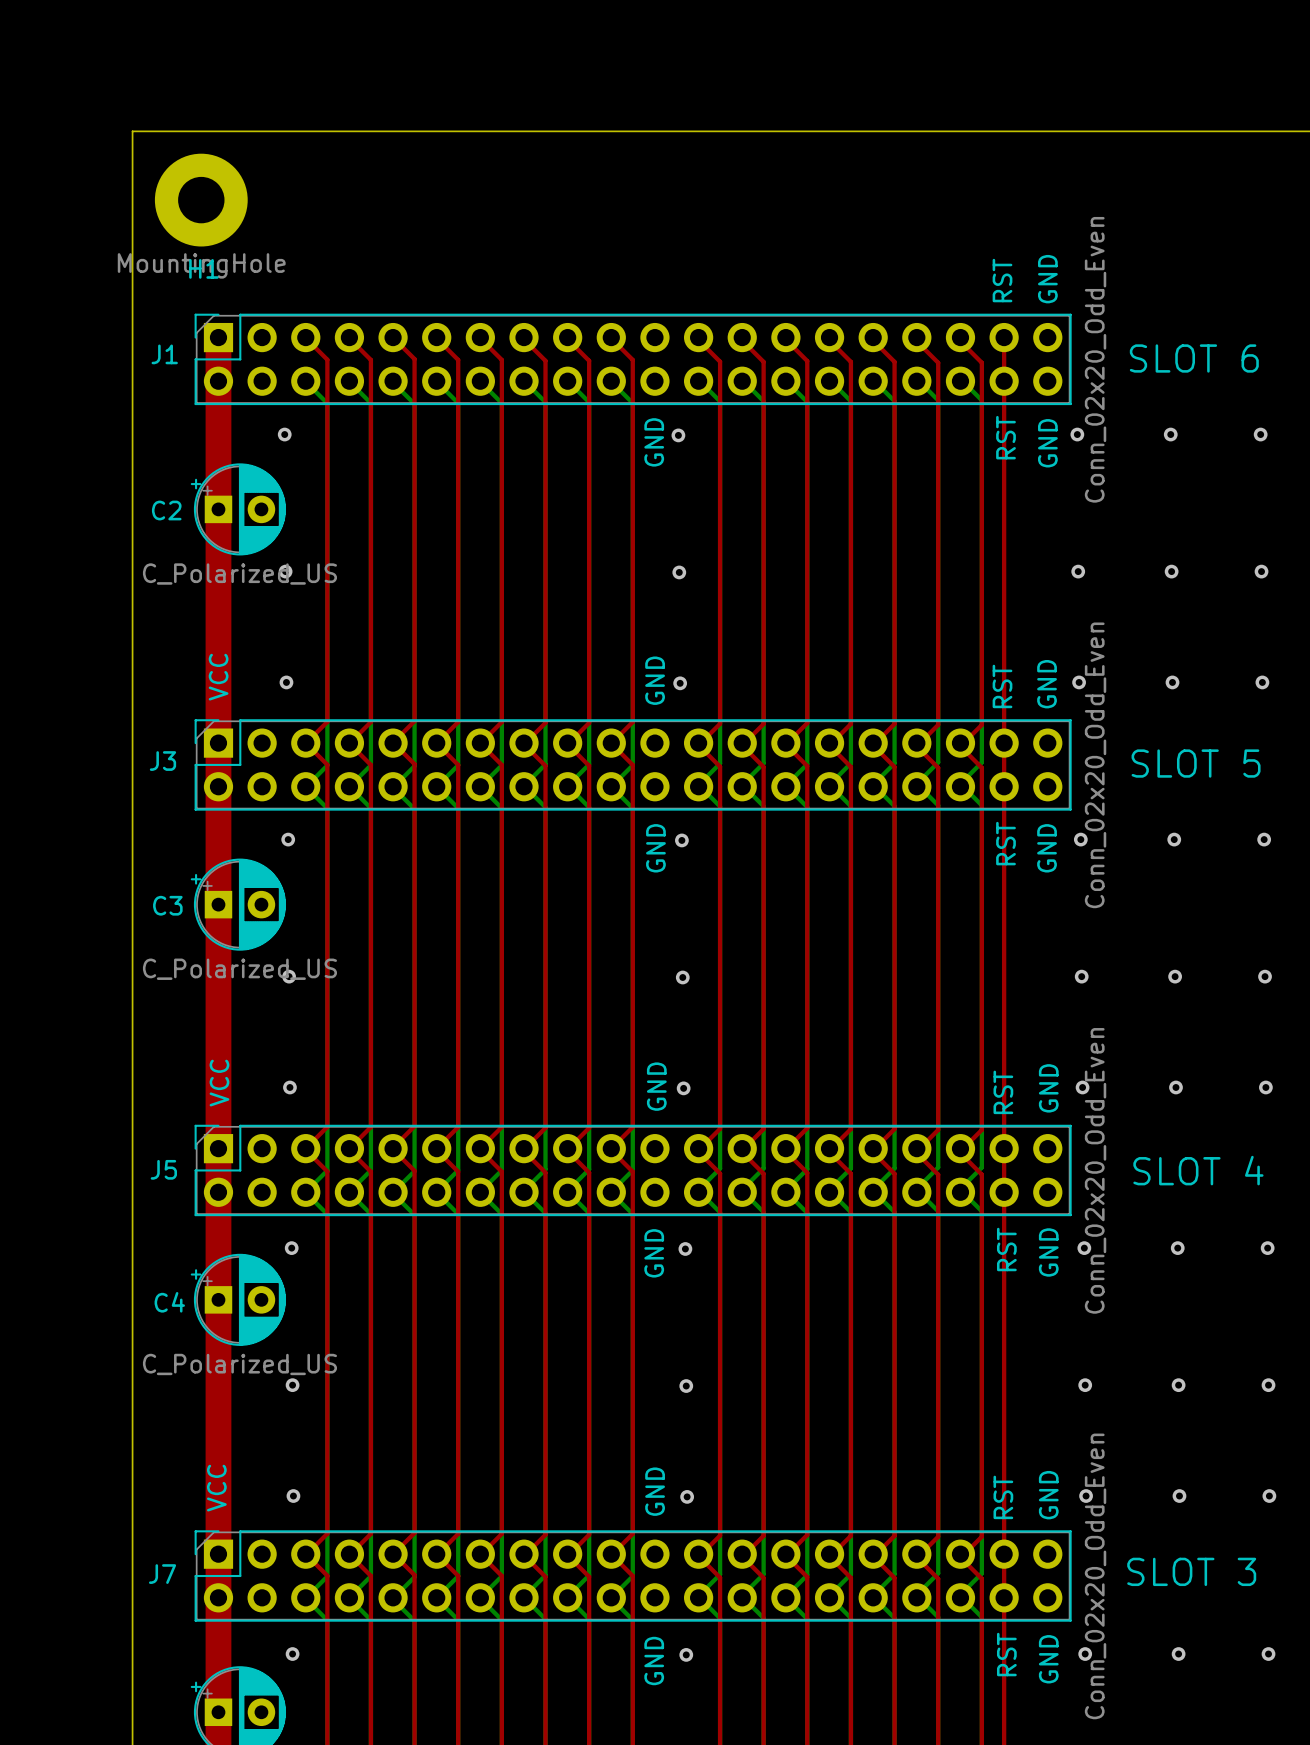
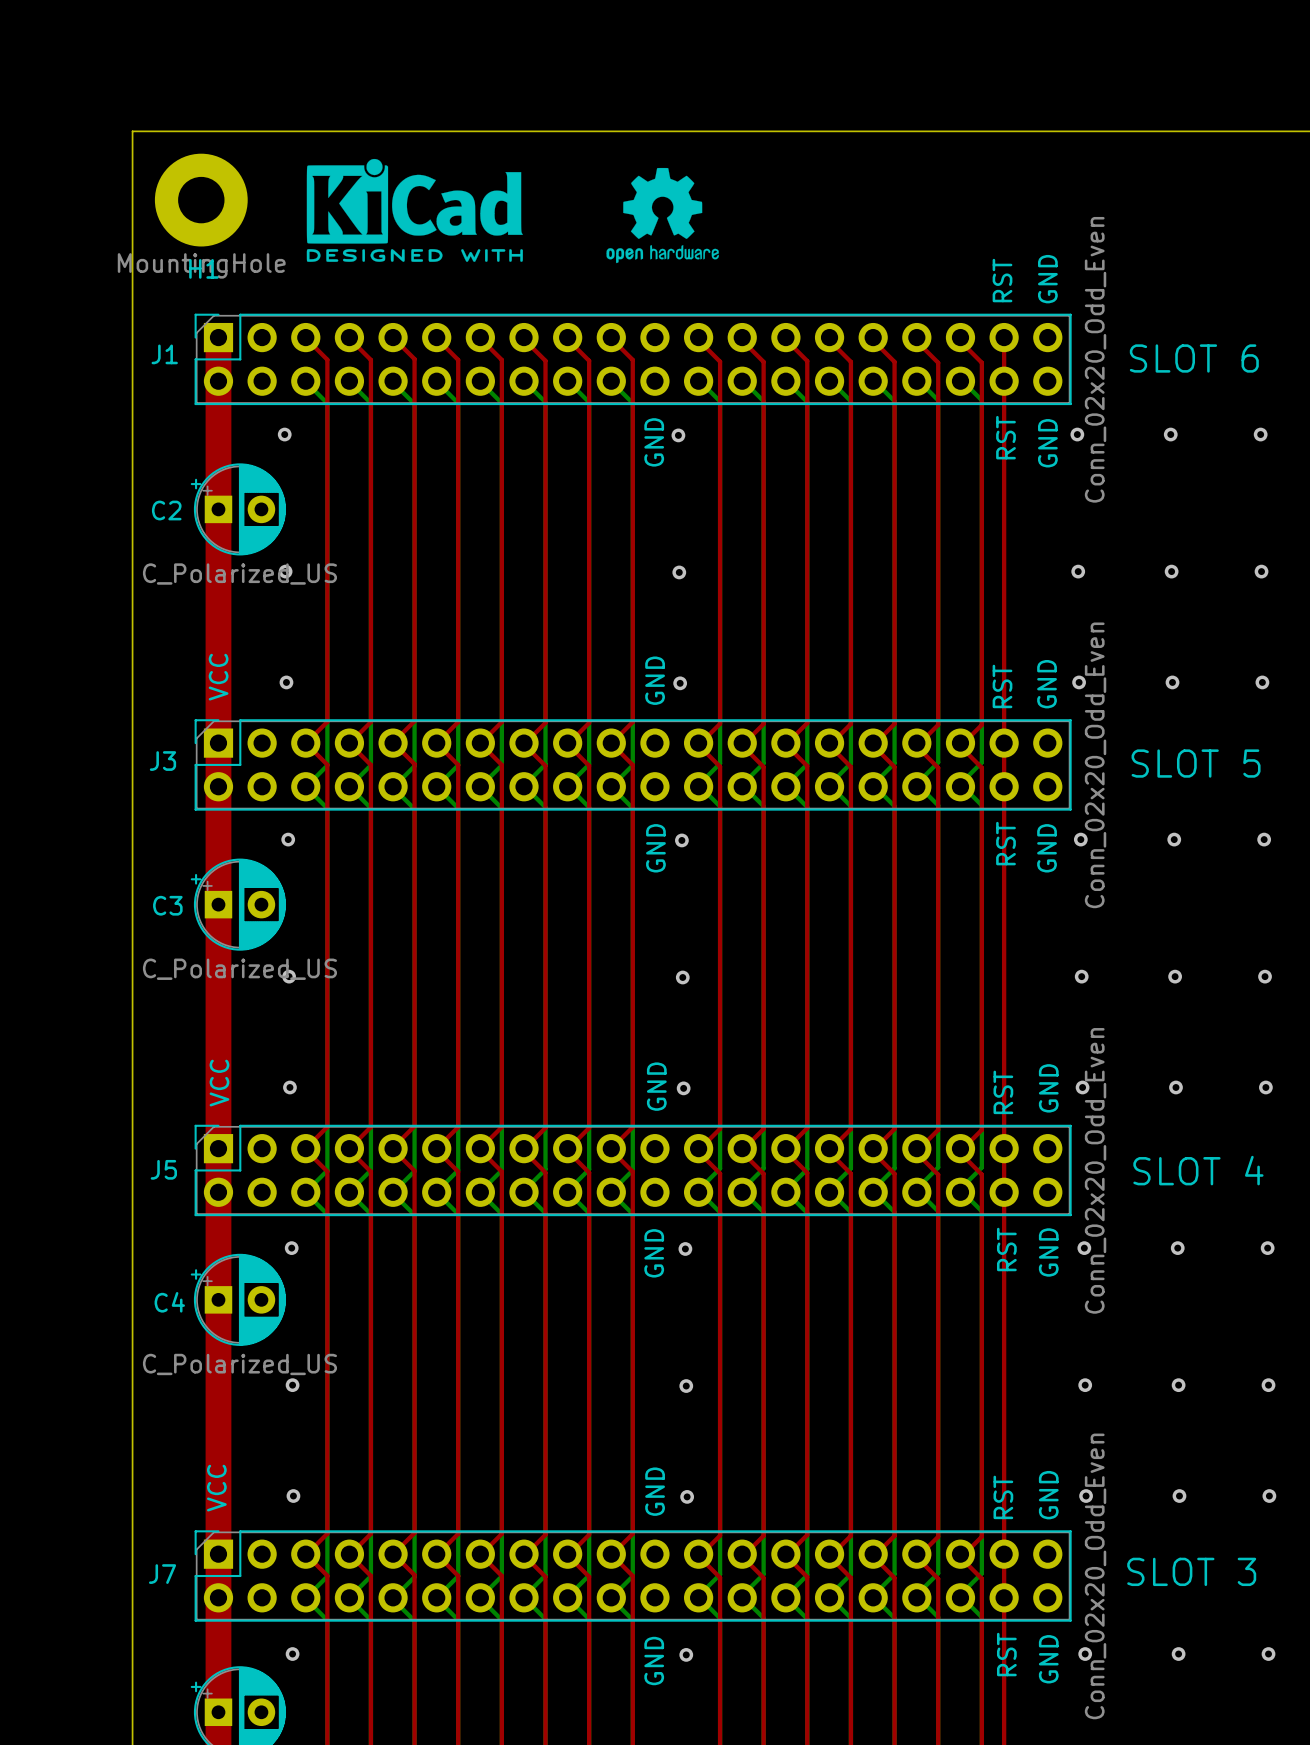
drawing: none -> [306, 158, 523, 262]
drawing: none -> [606, 167, 719, 264]

